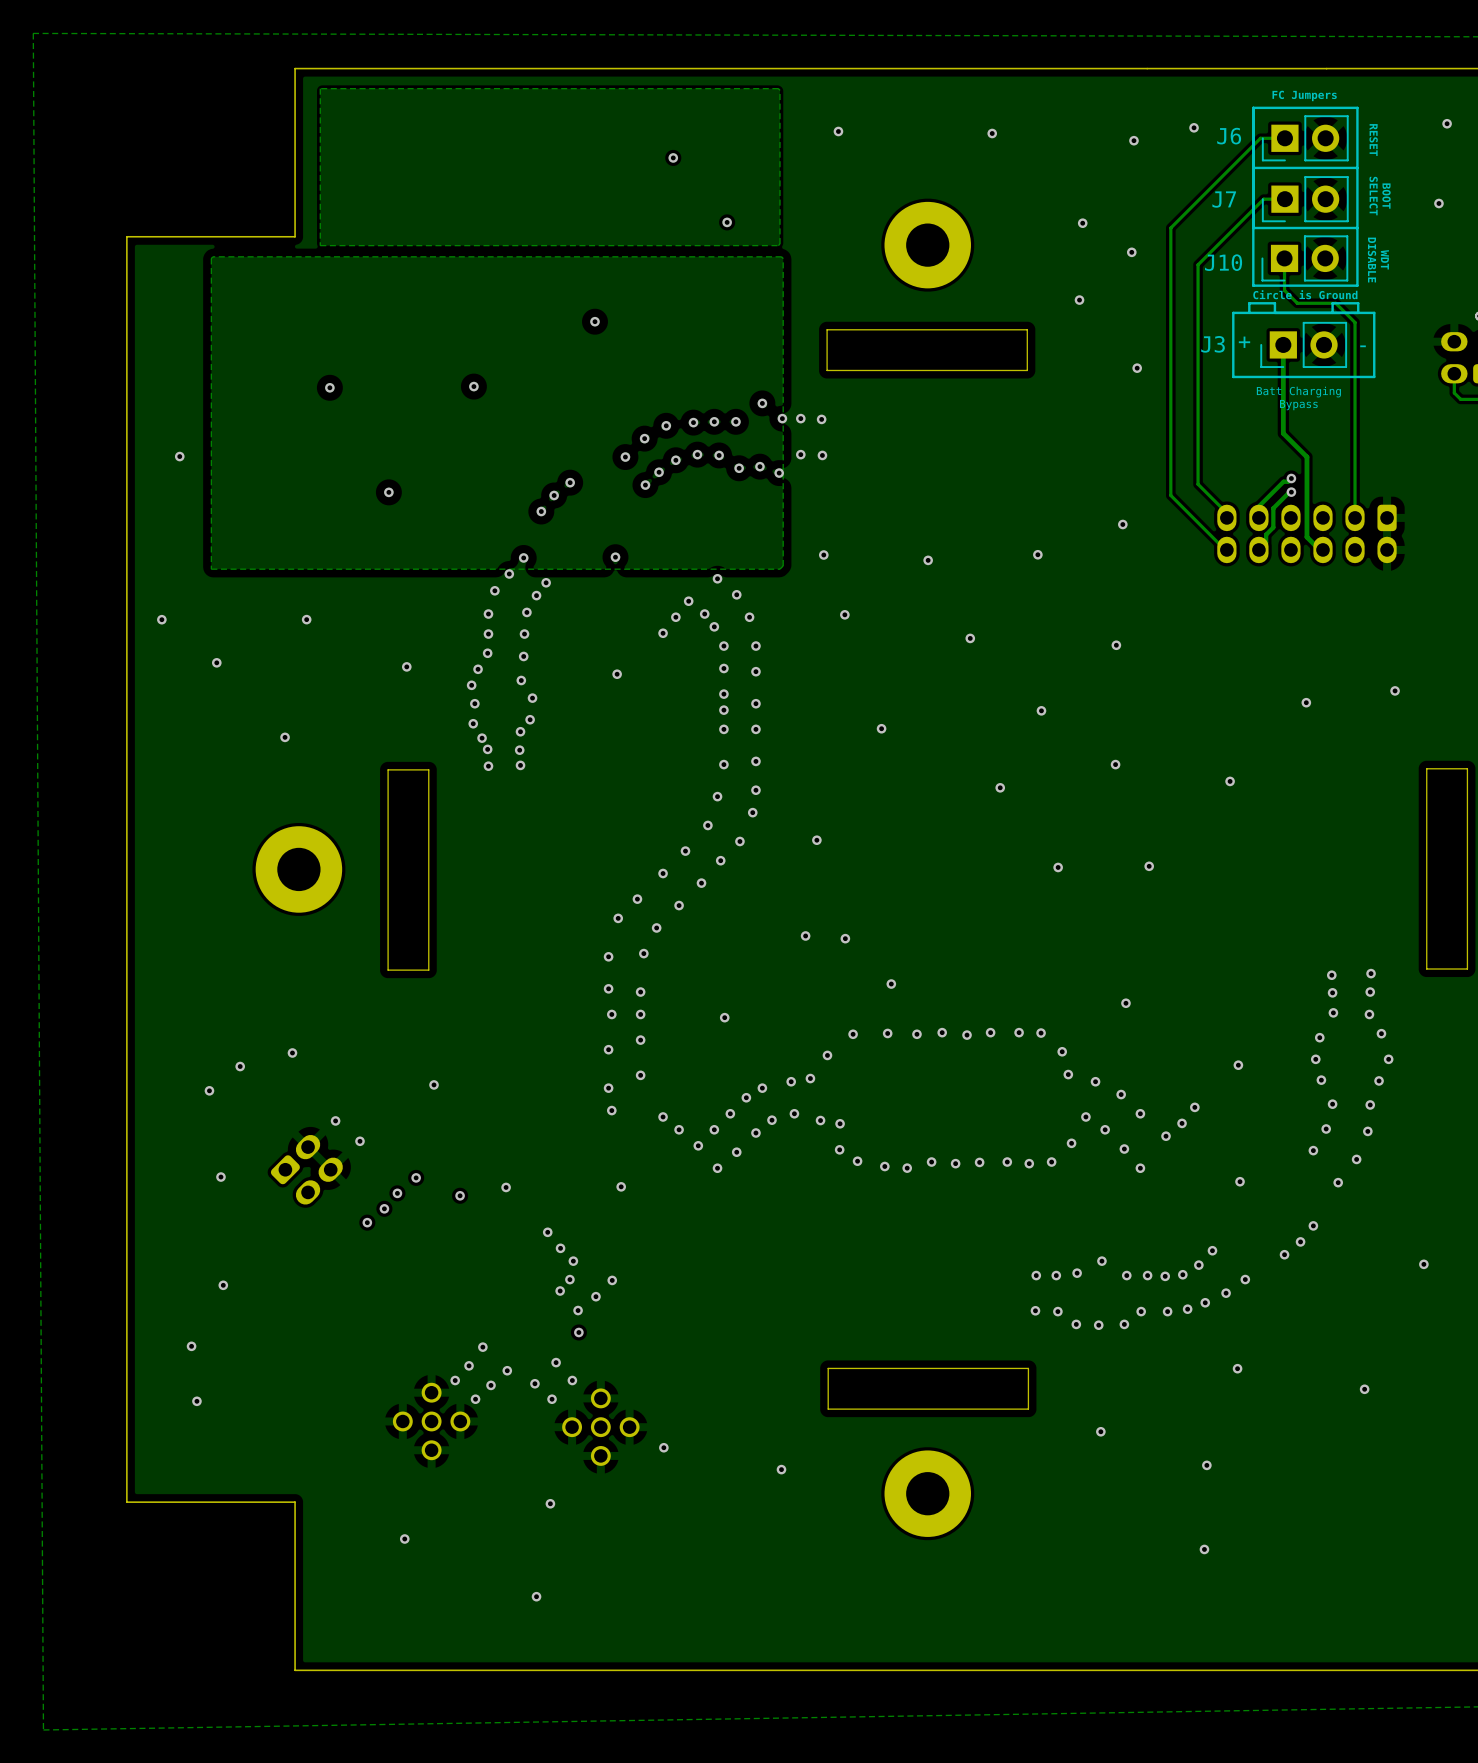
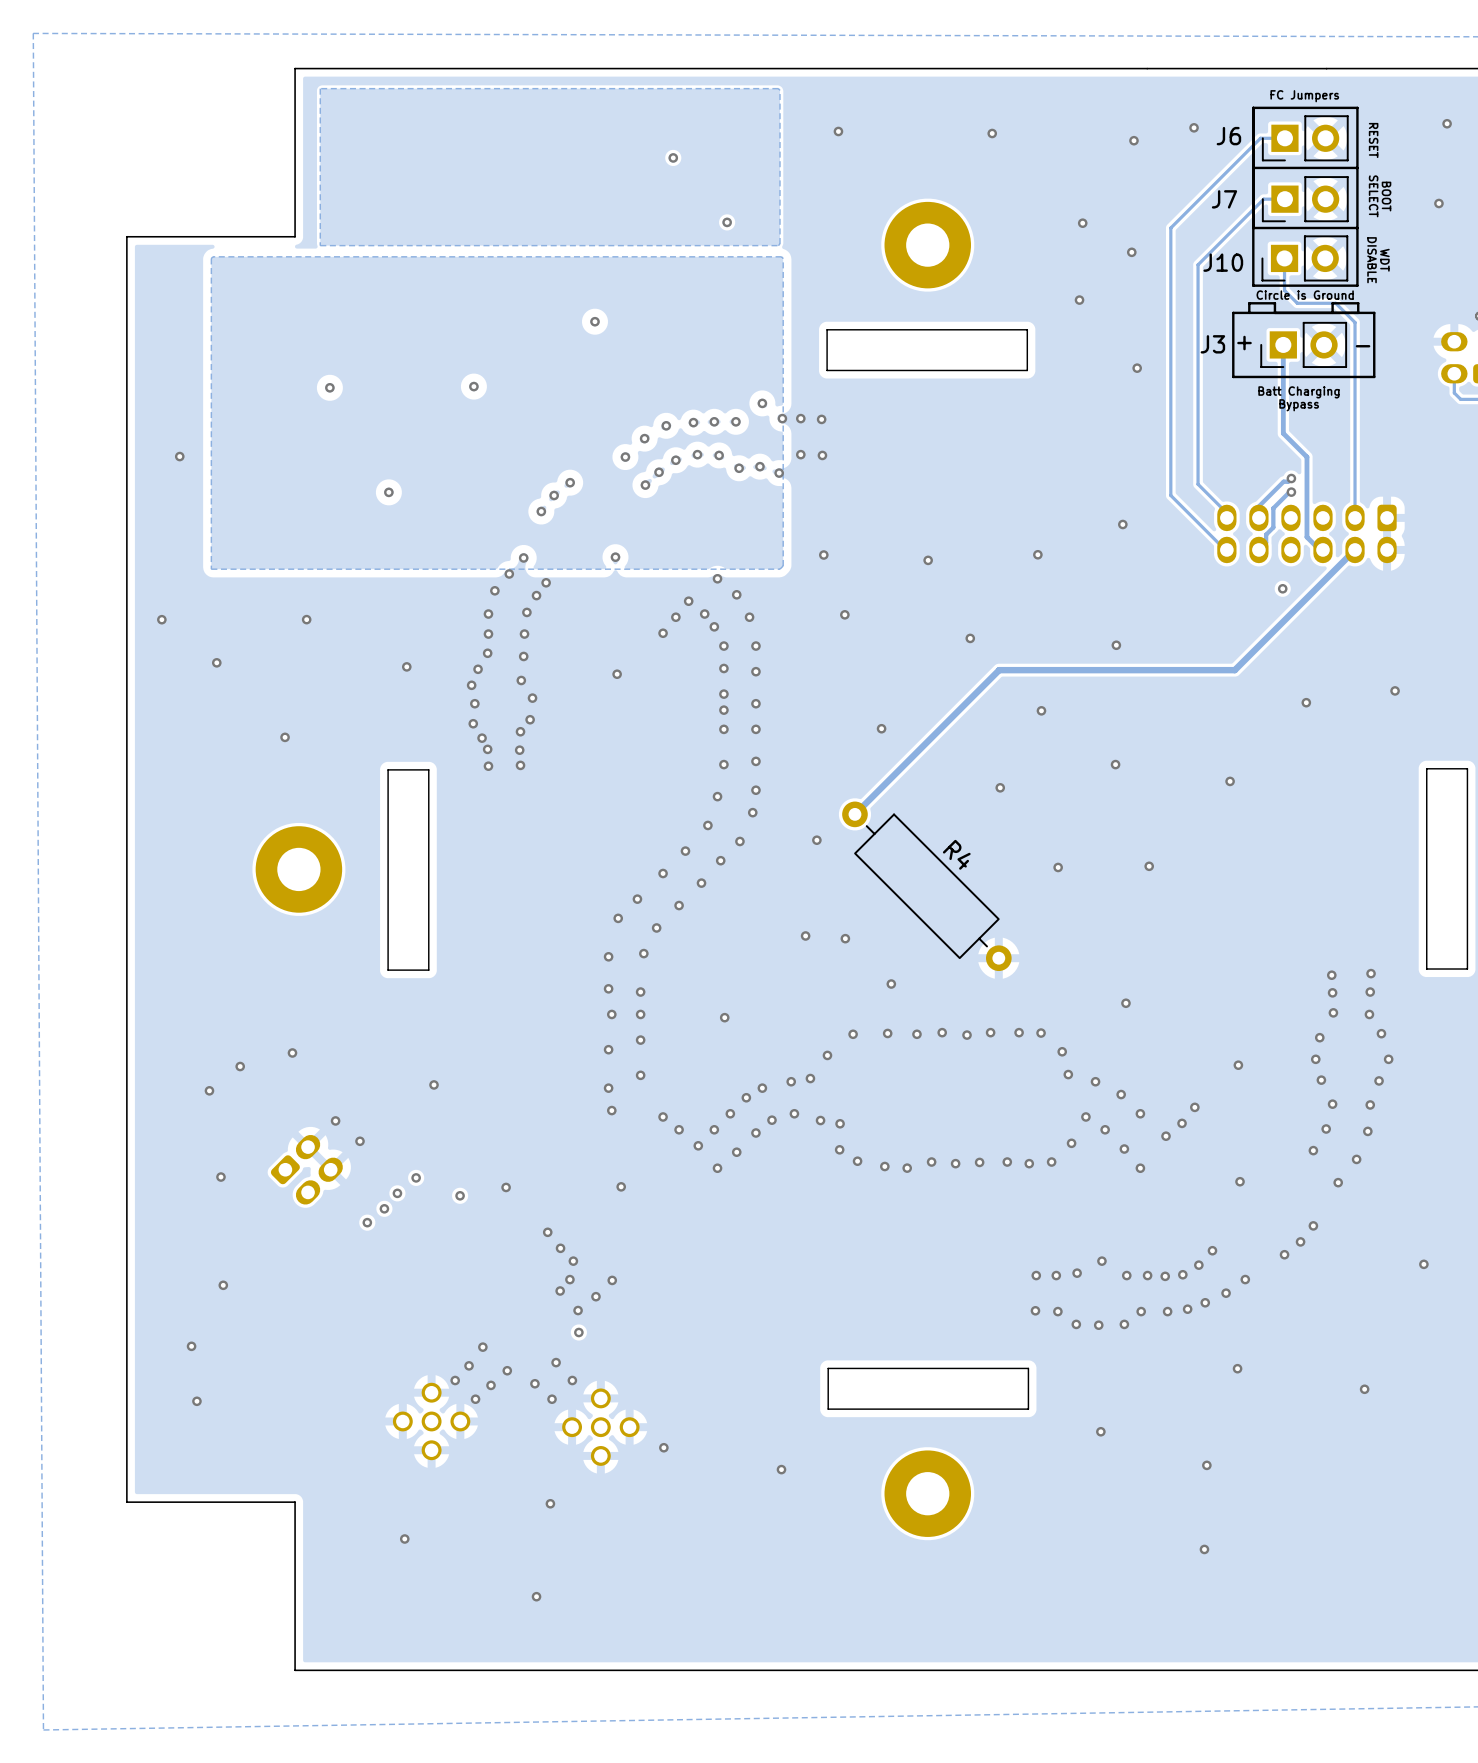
track: none -> (1355, 549) (1234, 670) (999, 670) (854, 814)
via: none -> (1282, 588)
R4: none -> (926, 886)

